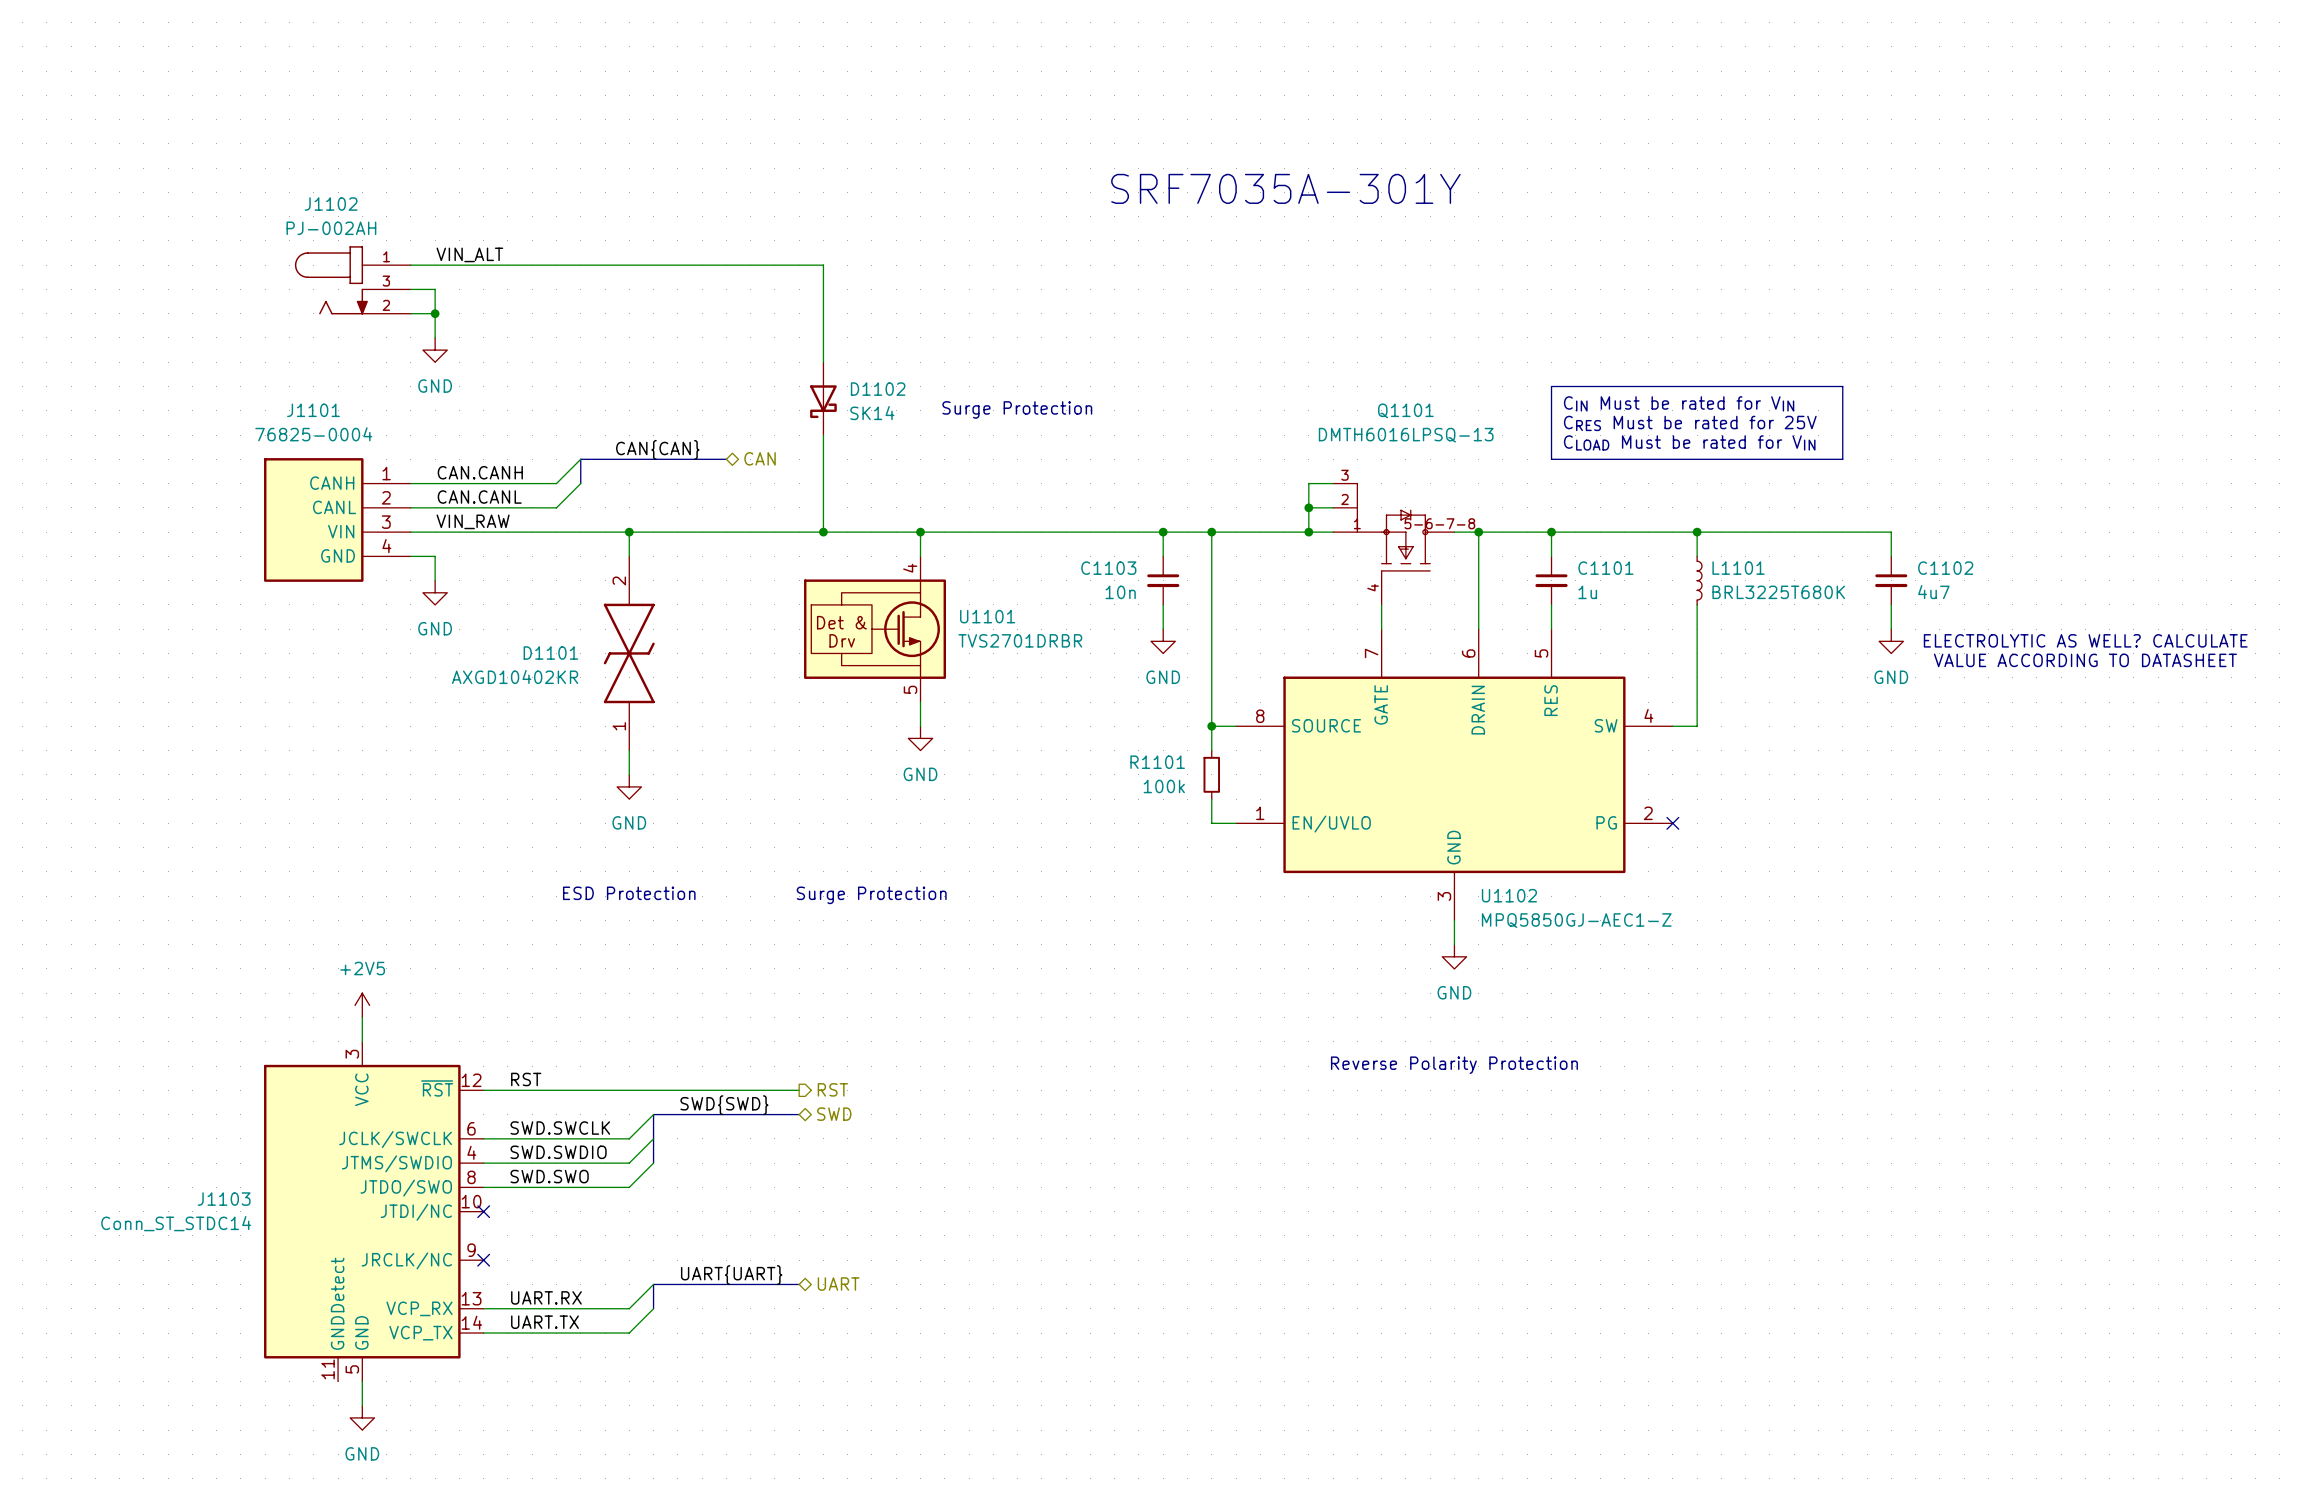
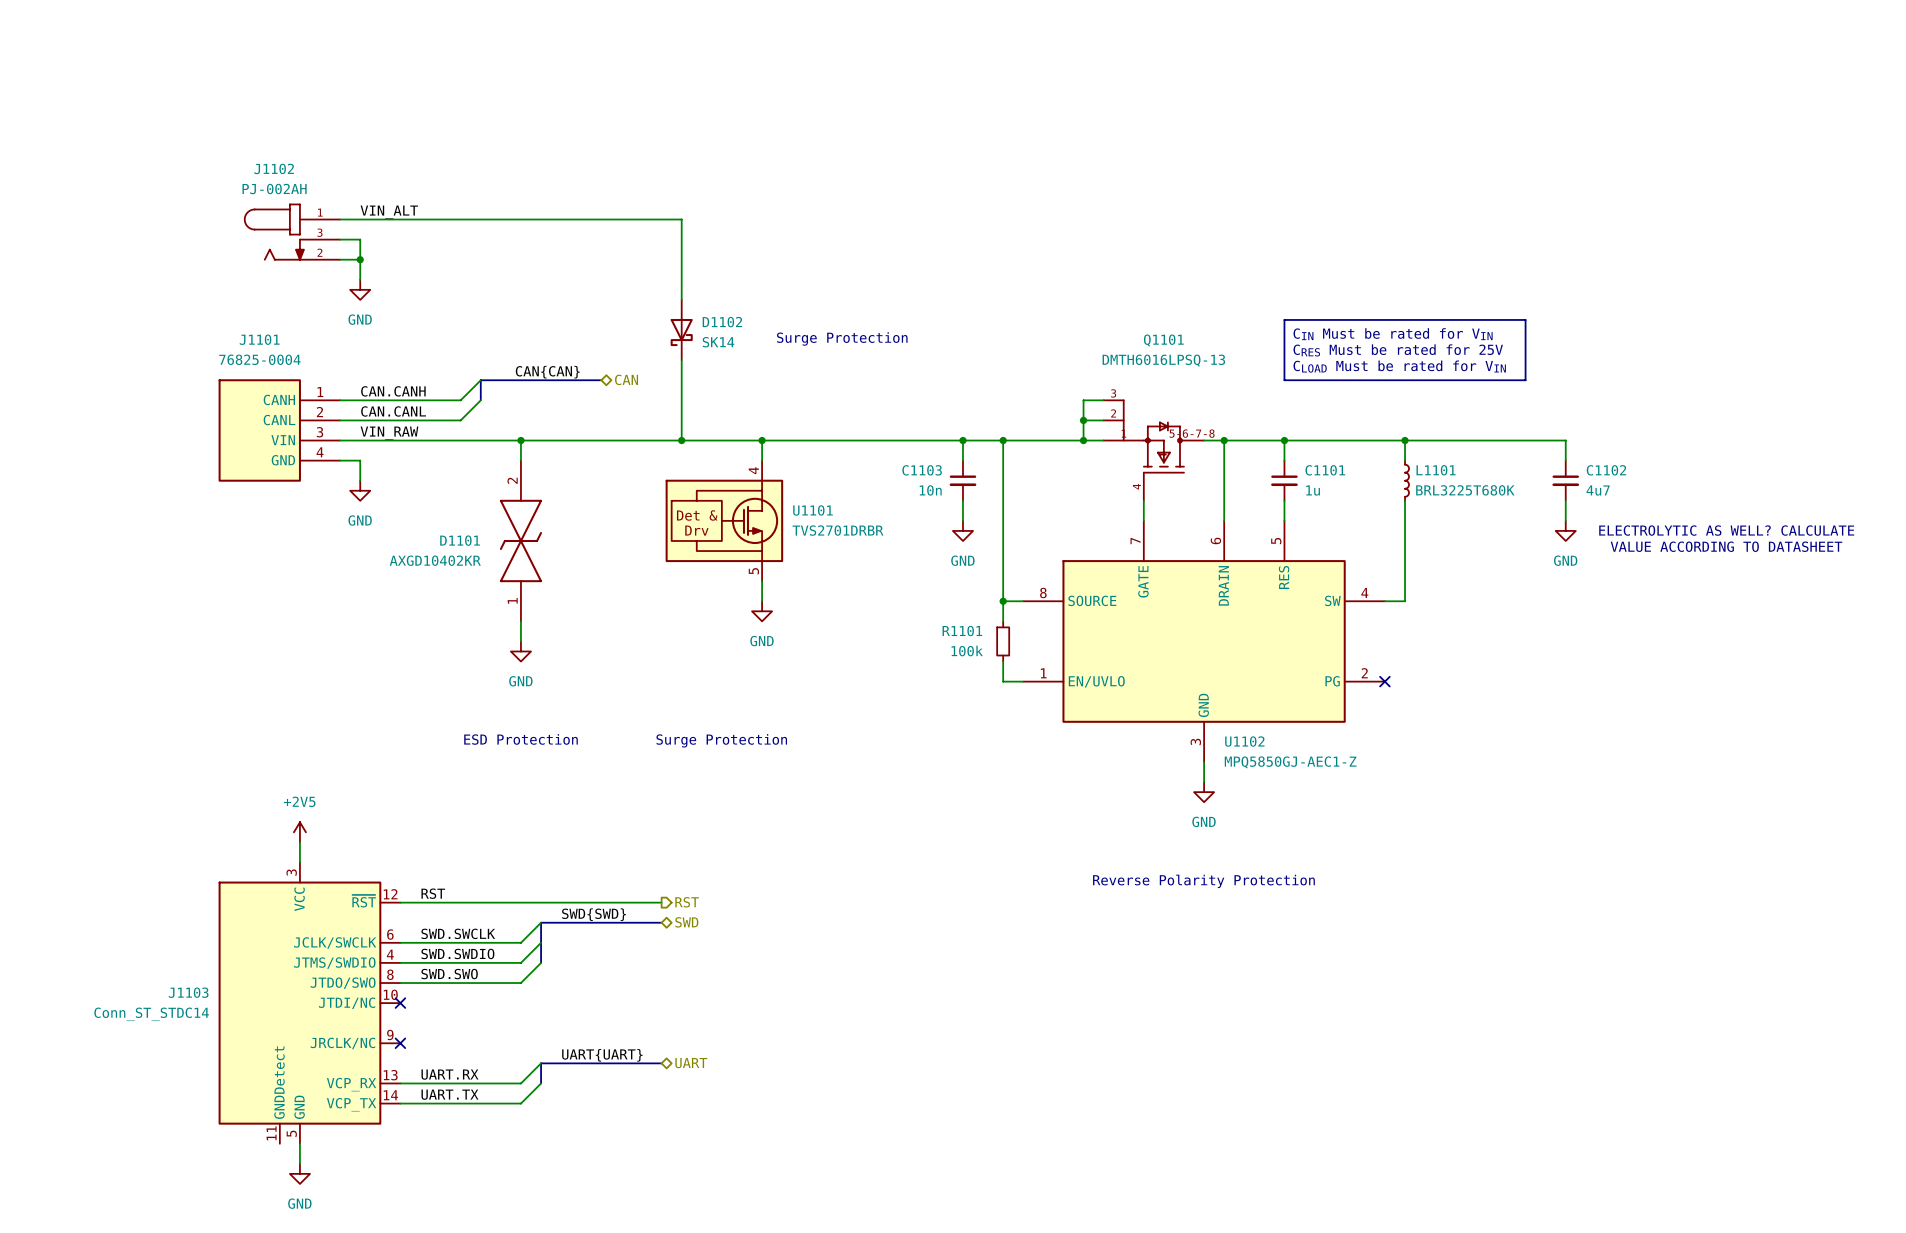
text: SRF7035A-301Y (1285, 188) -> none

